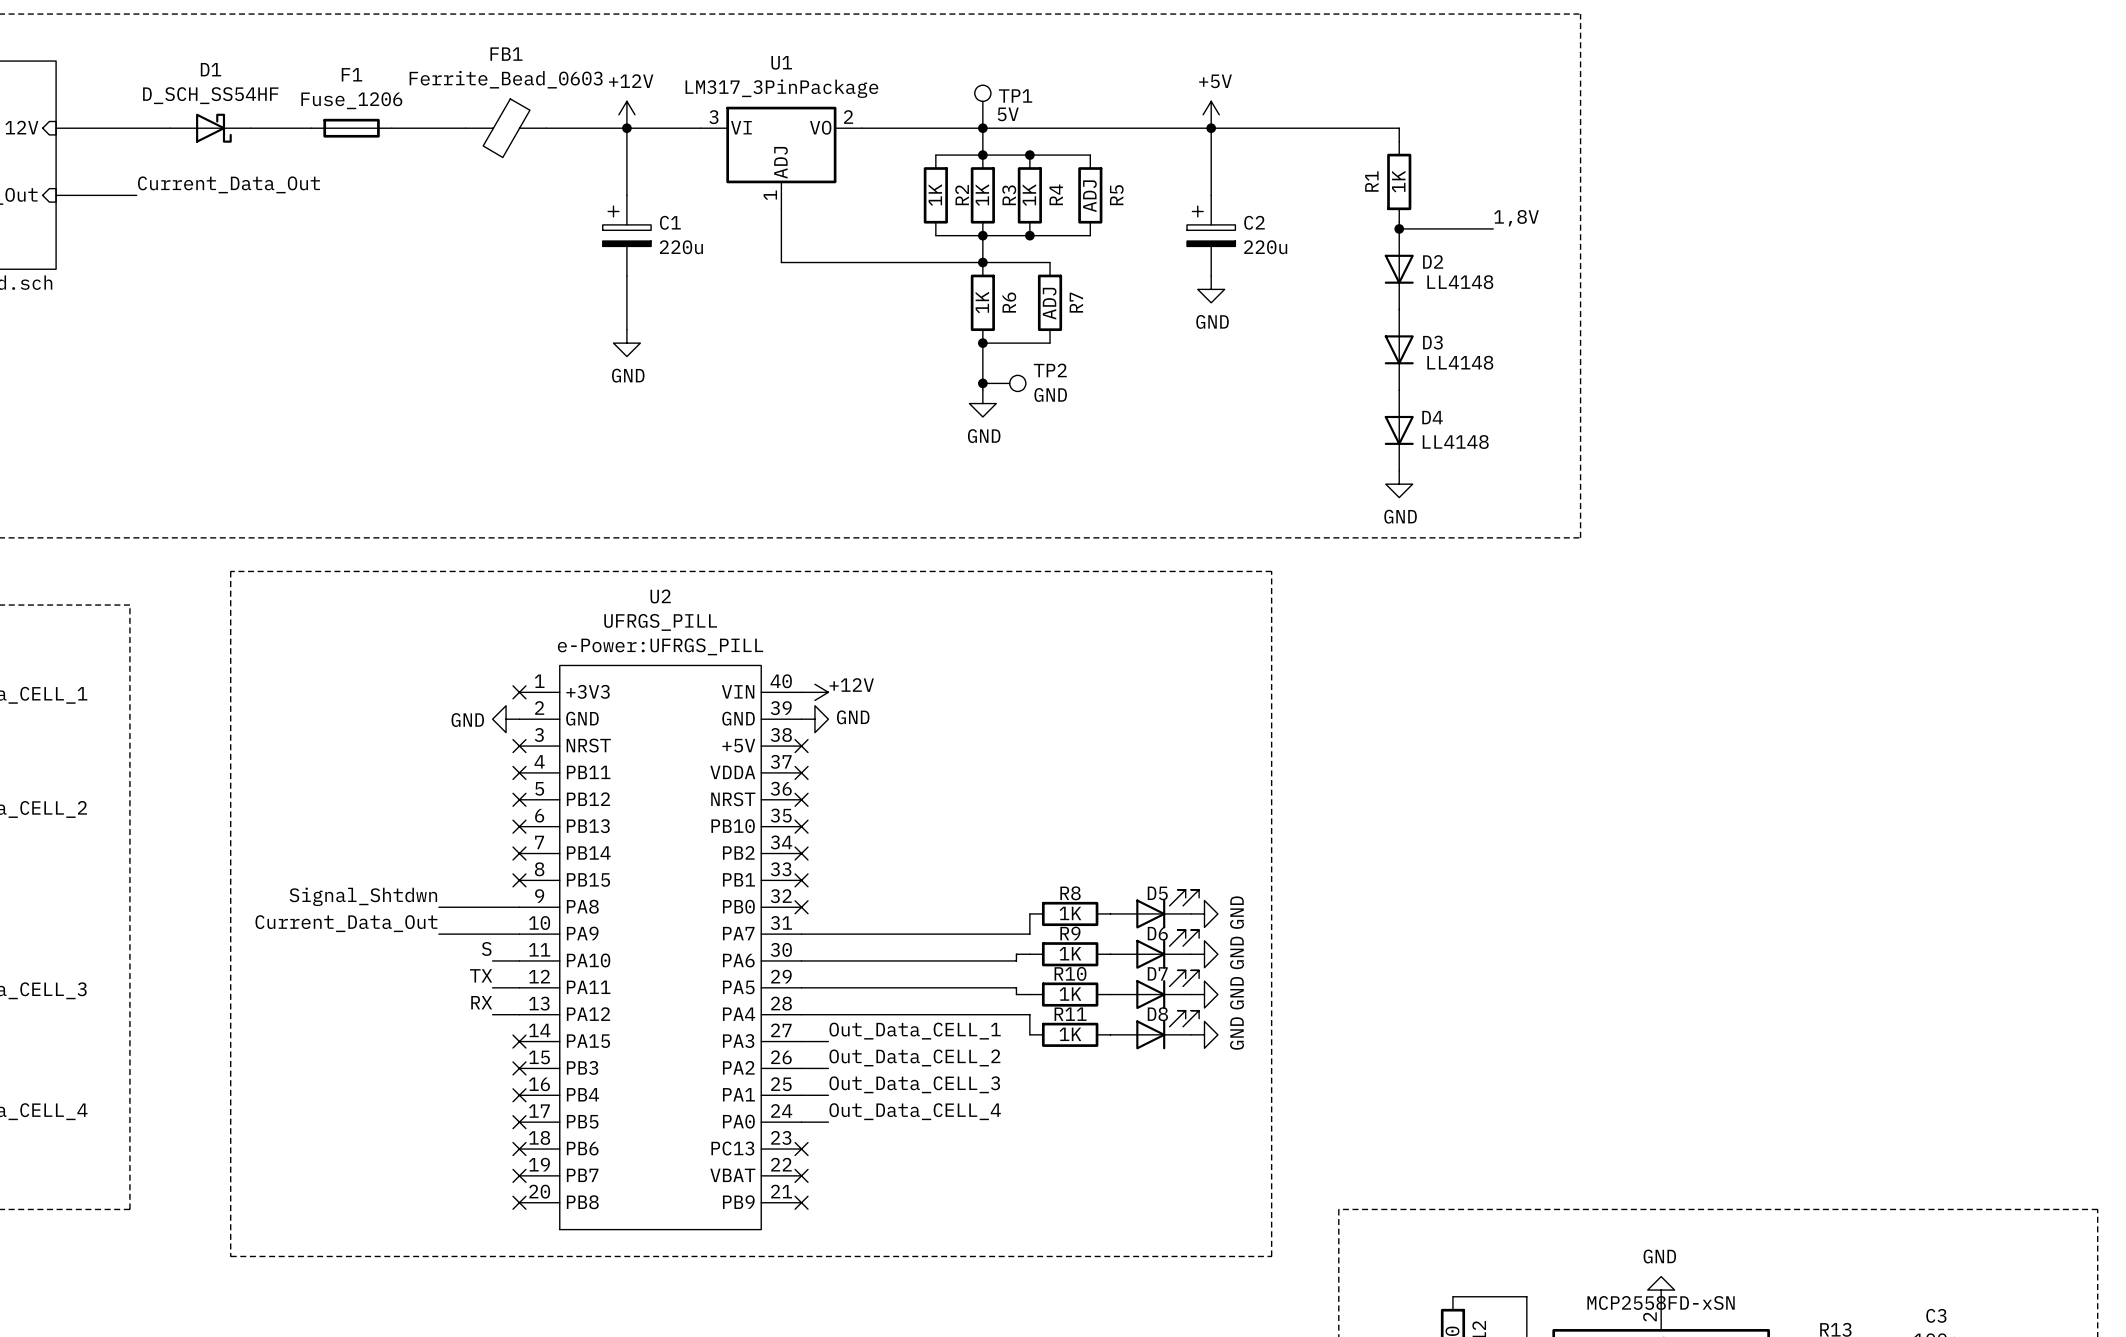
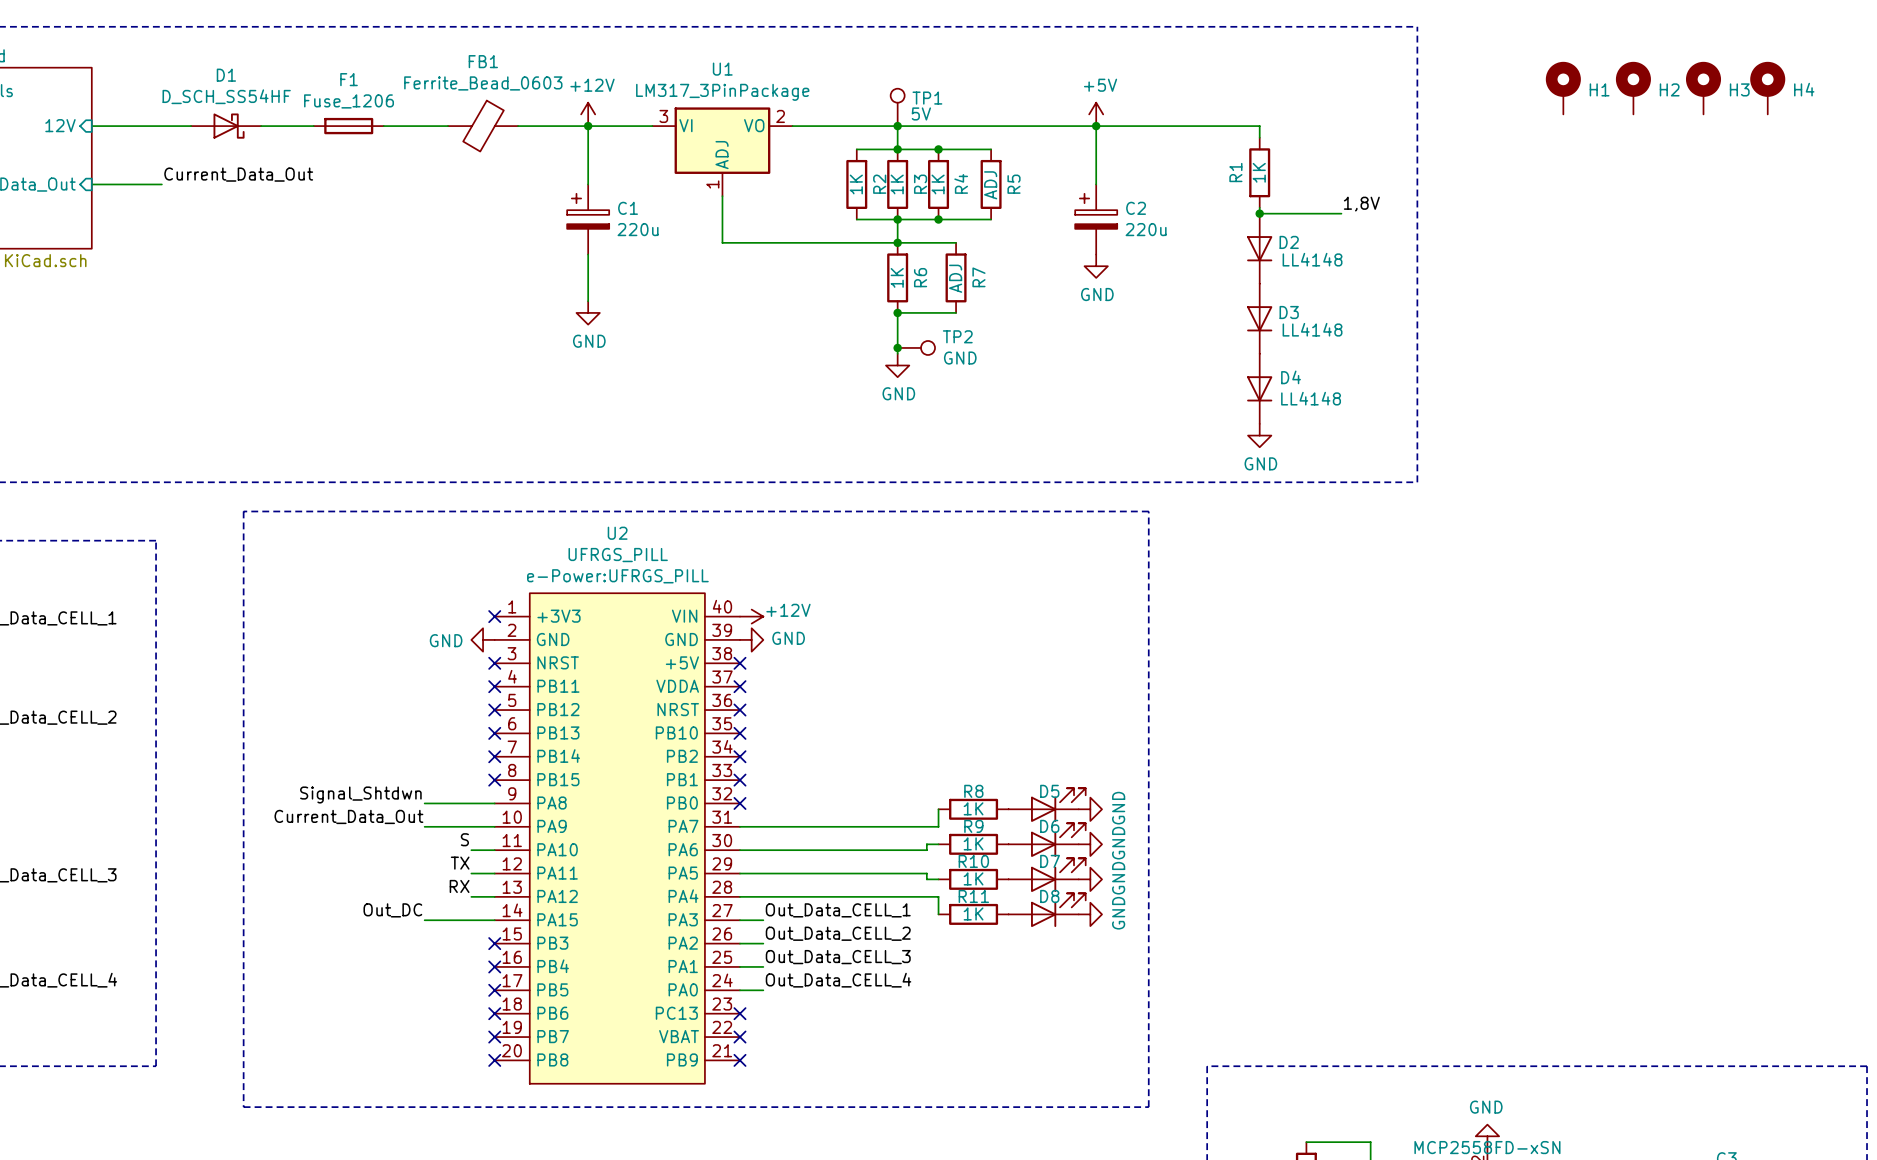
H1: none -> (1563, 88)
H2: none -> (1633, 88)
H3: none -> (1703, 88)
H4: none -> (1767, 88)
label: none -> Out_DC (392, 910)
wire: none -> (424, 920) (494, 920)
no-connect mark: (519, 1041) -> none

